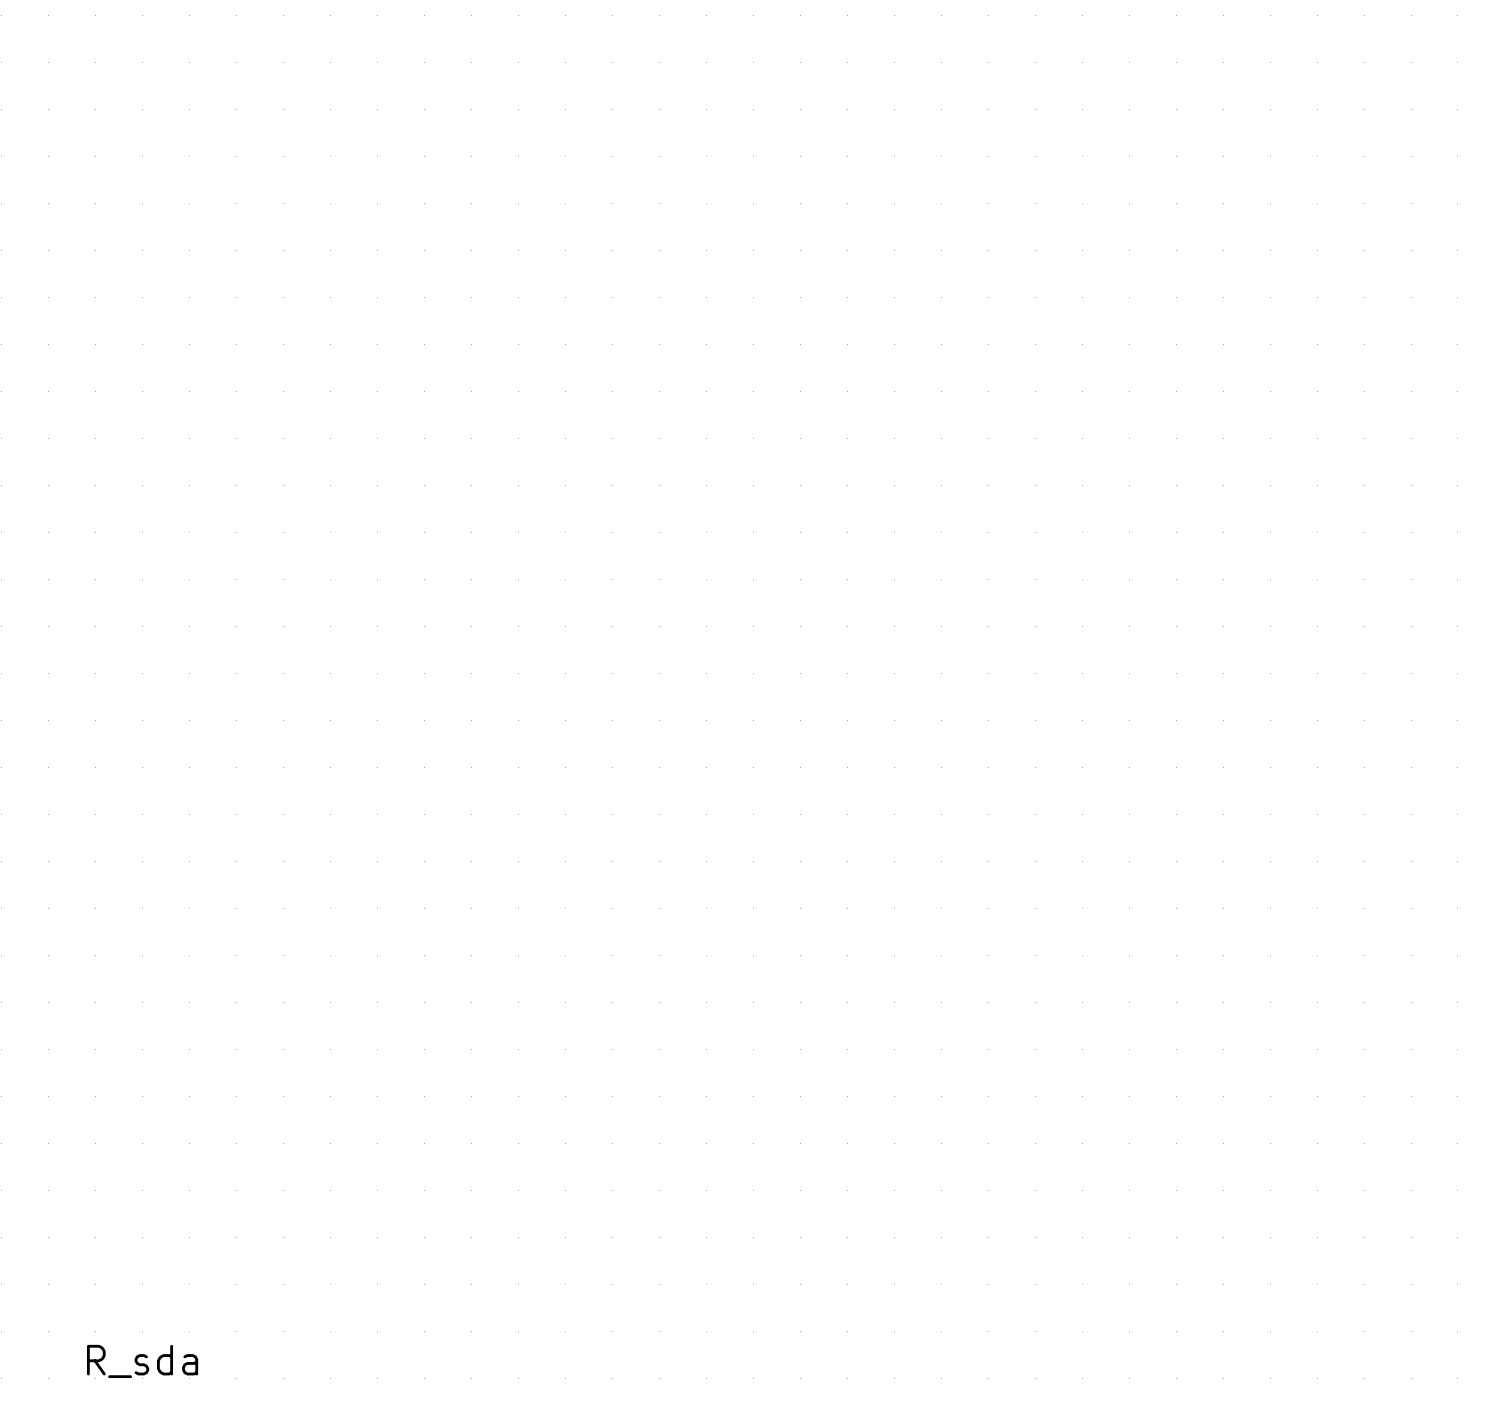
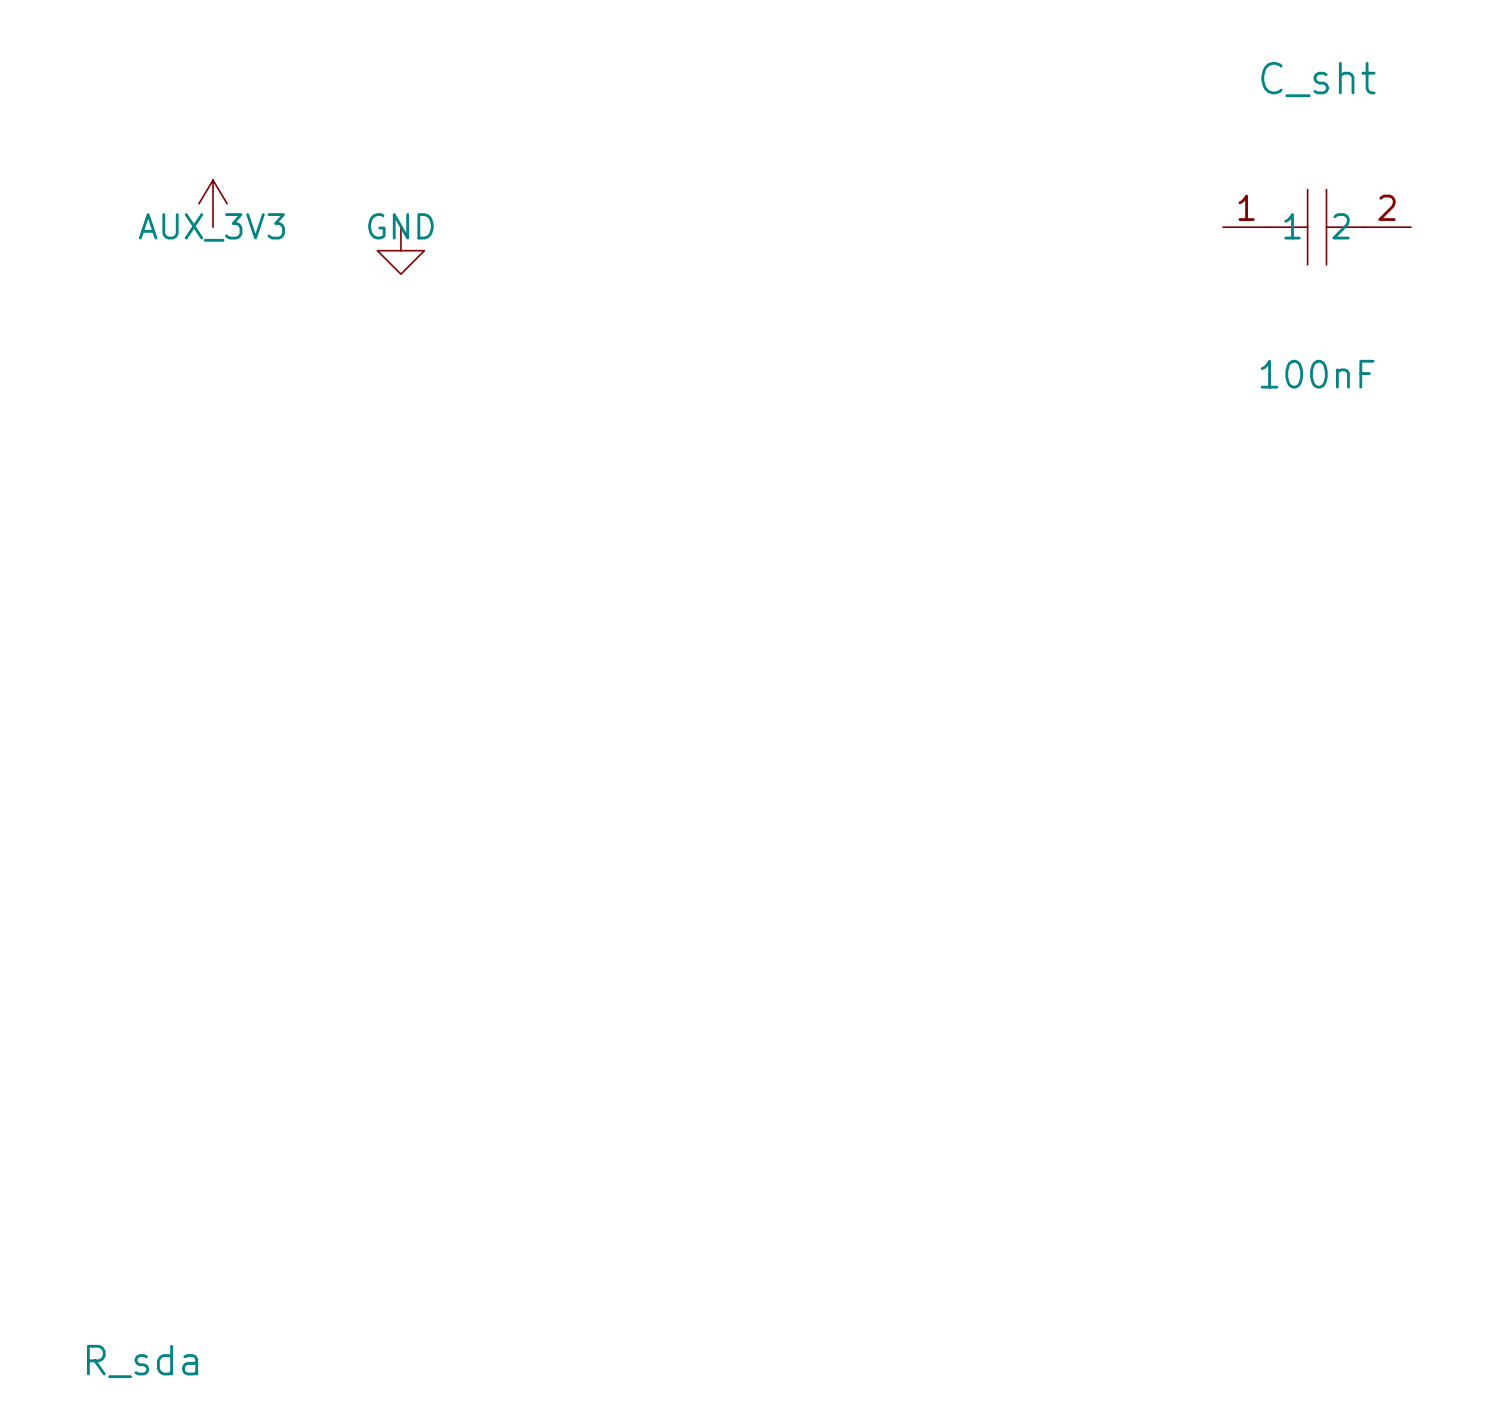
power symbol: none -> AUX_3V3 (213, 203)
C_sht: none -> 100nF (1317, 227)
power symbol: none -> GND (400, 250)

